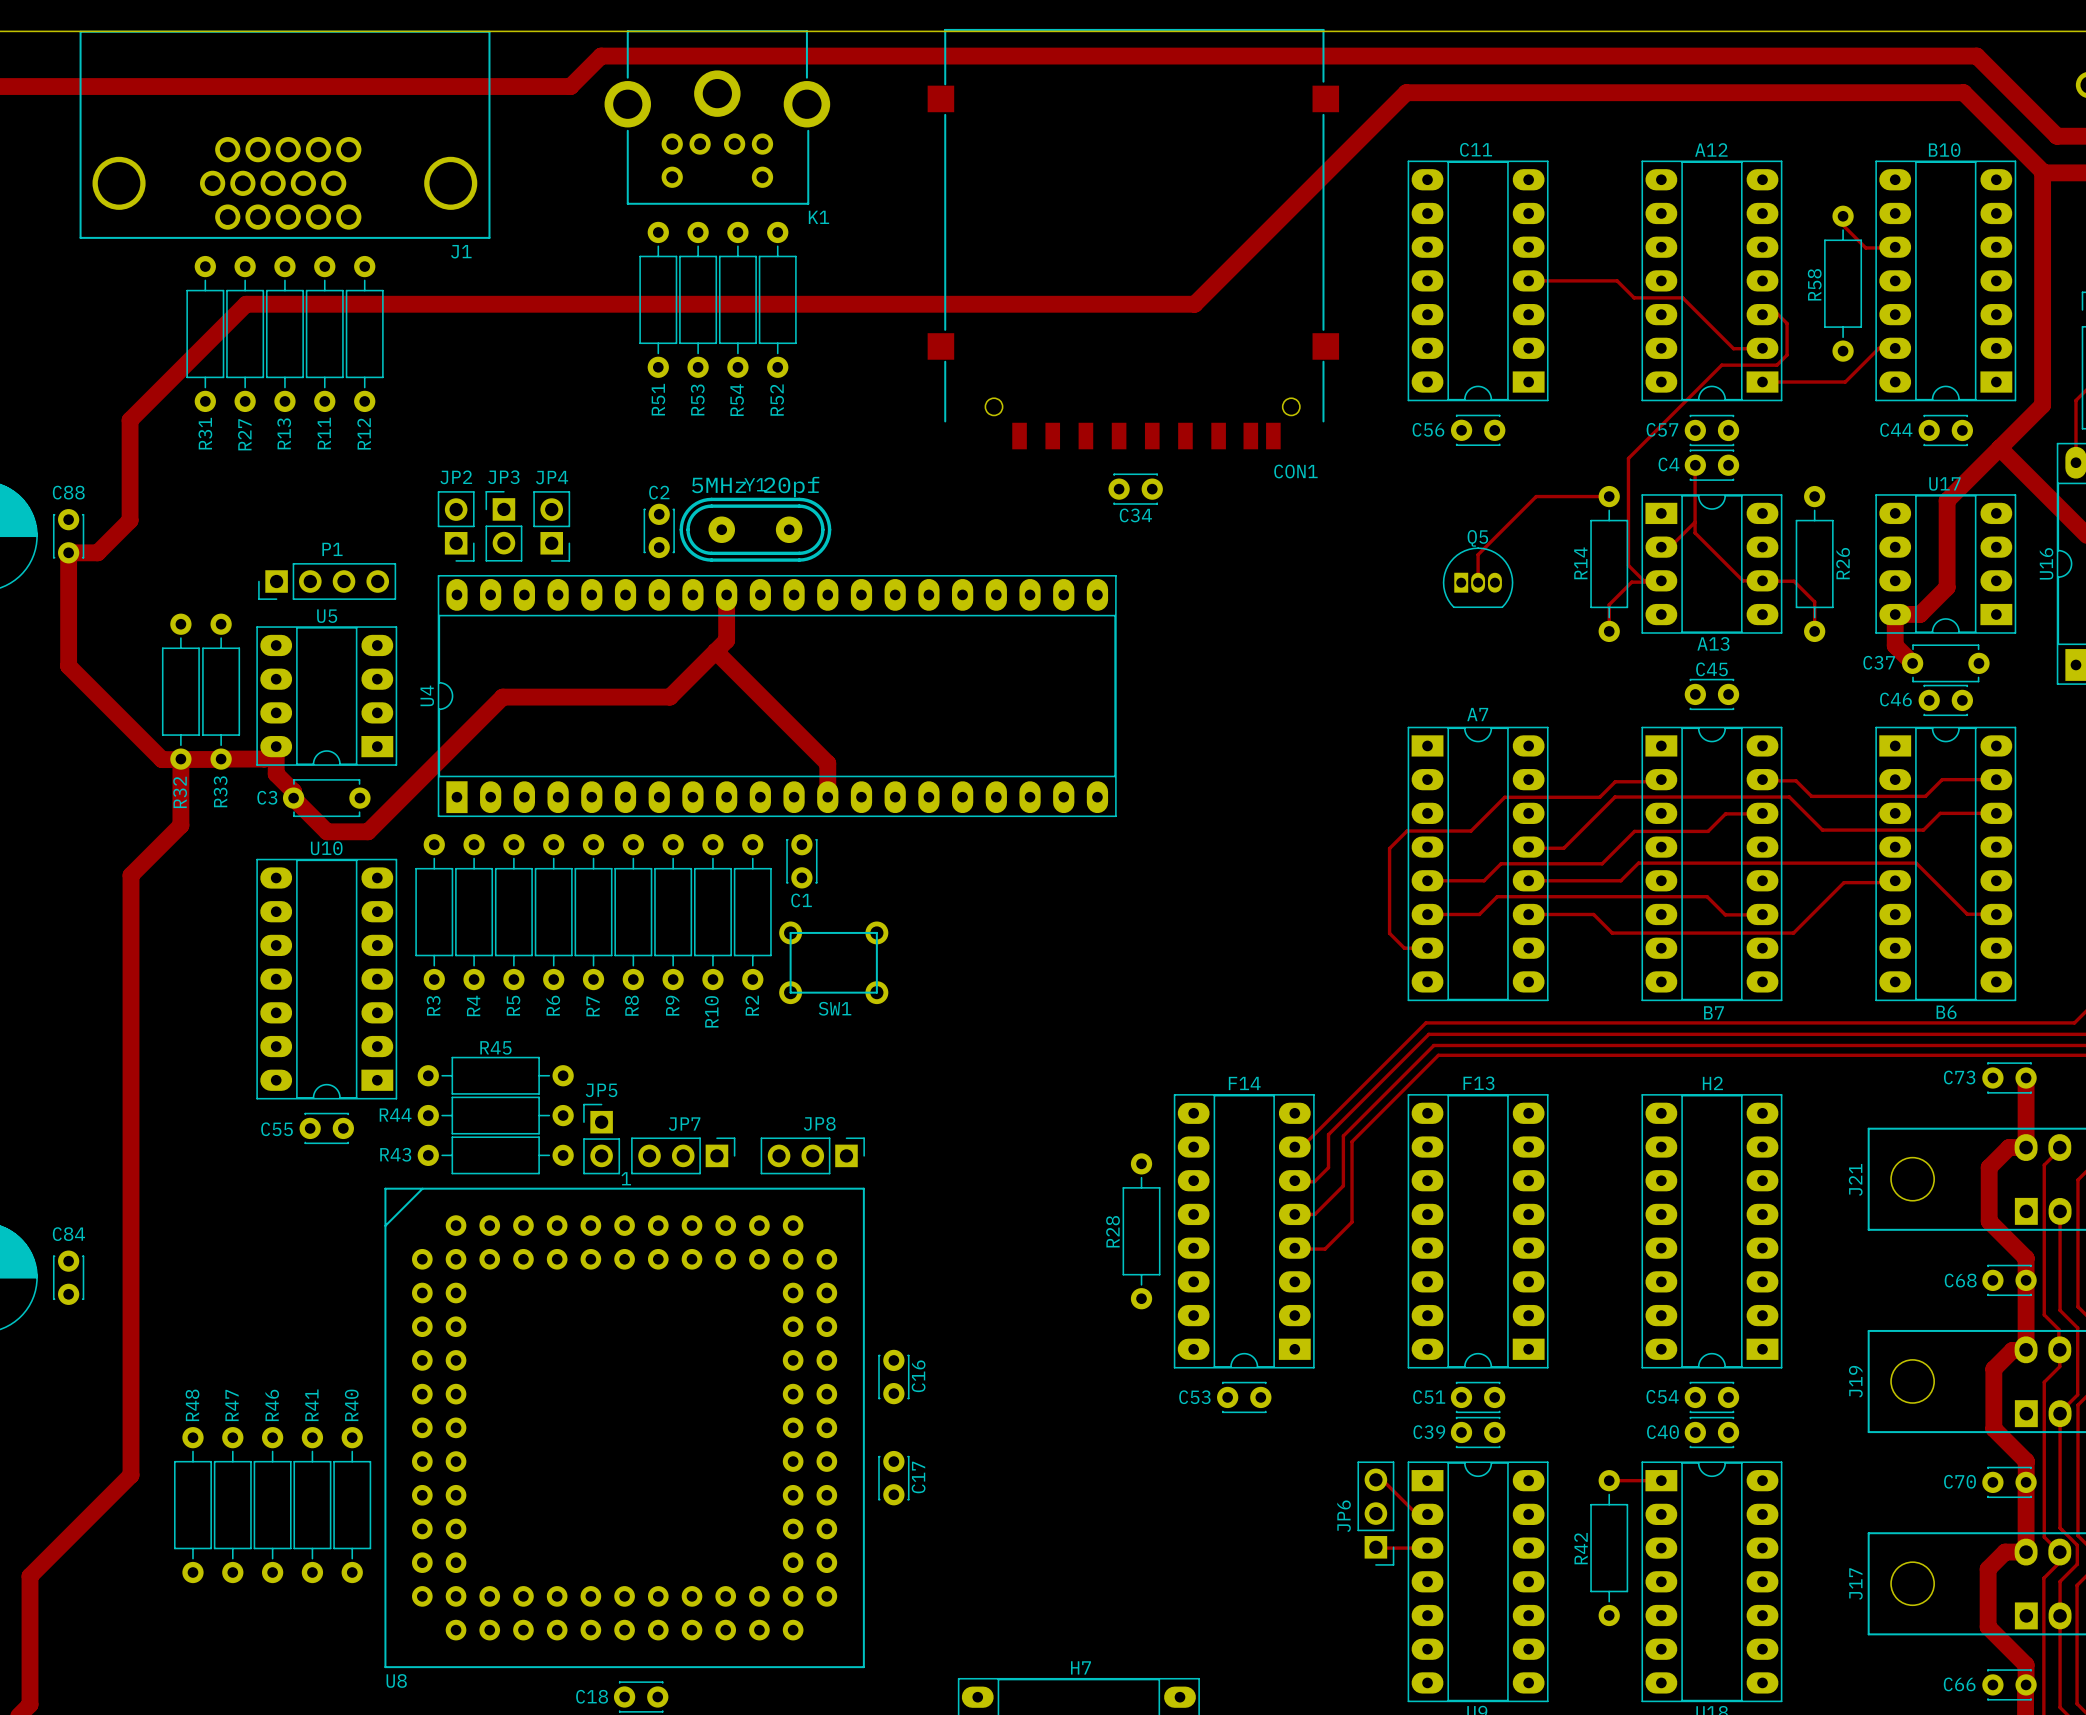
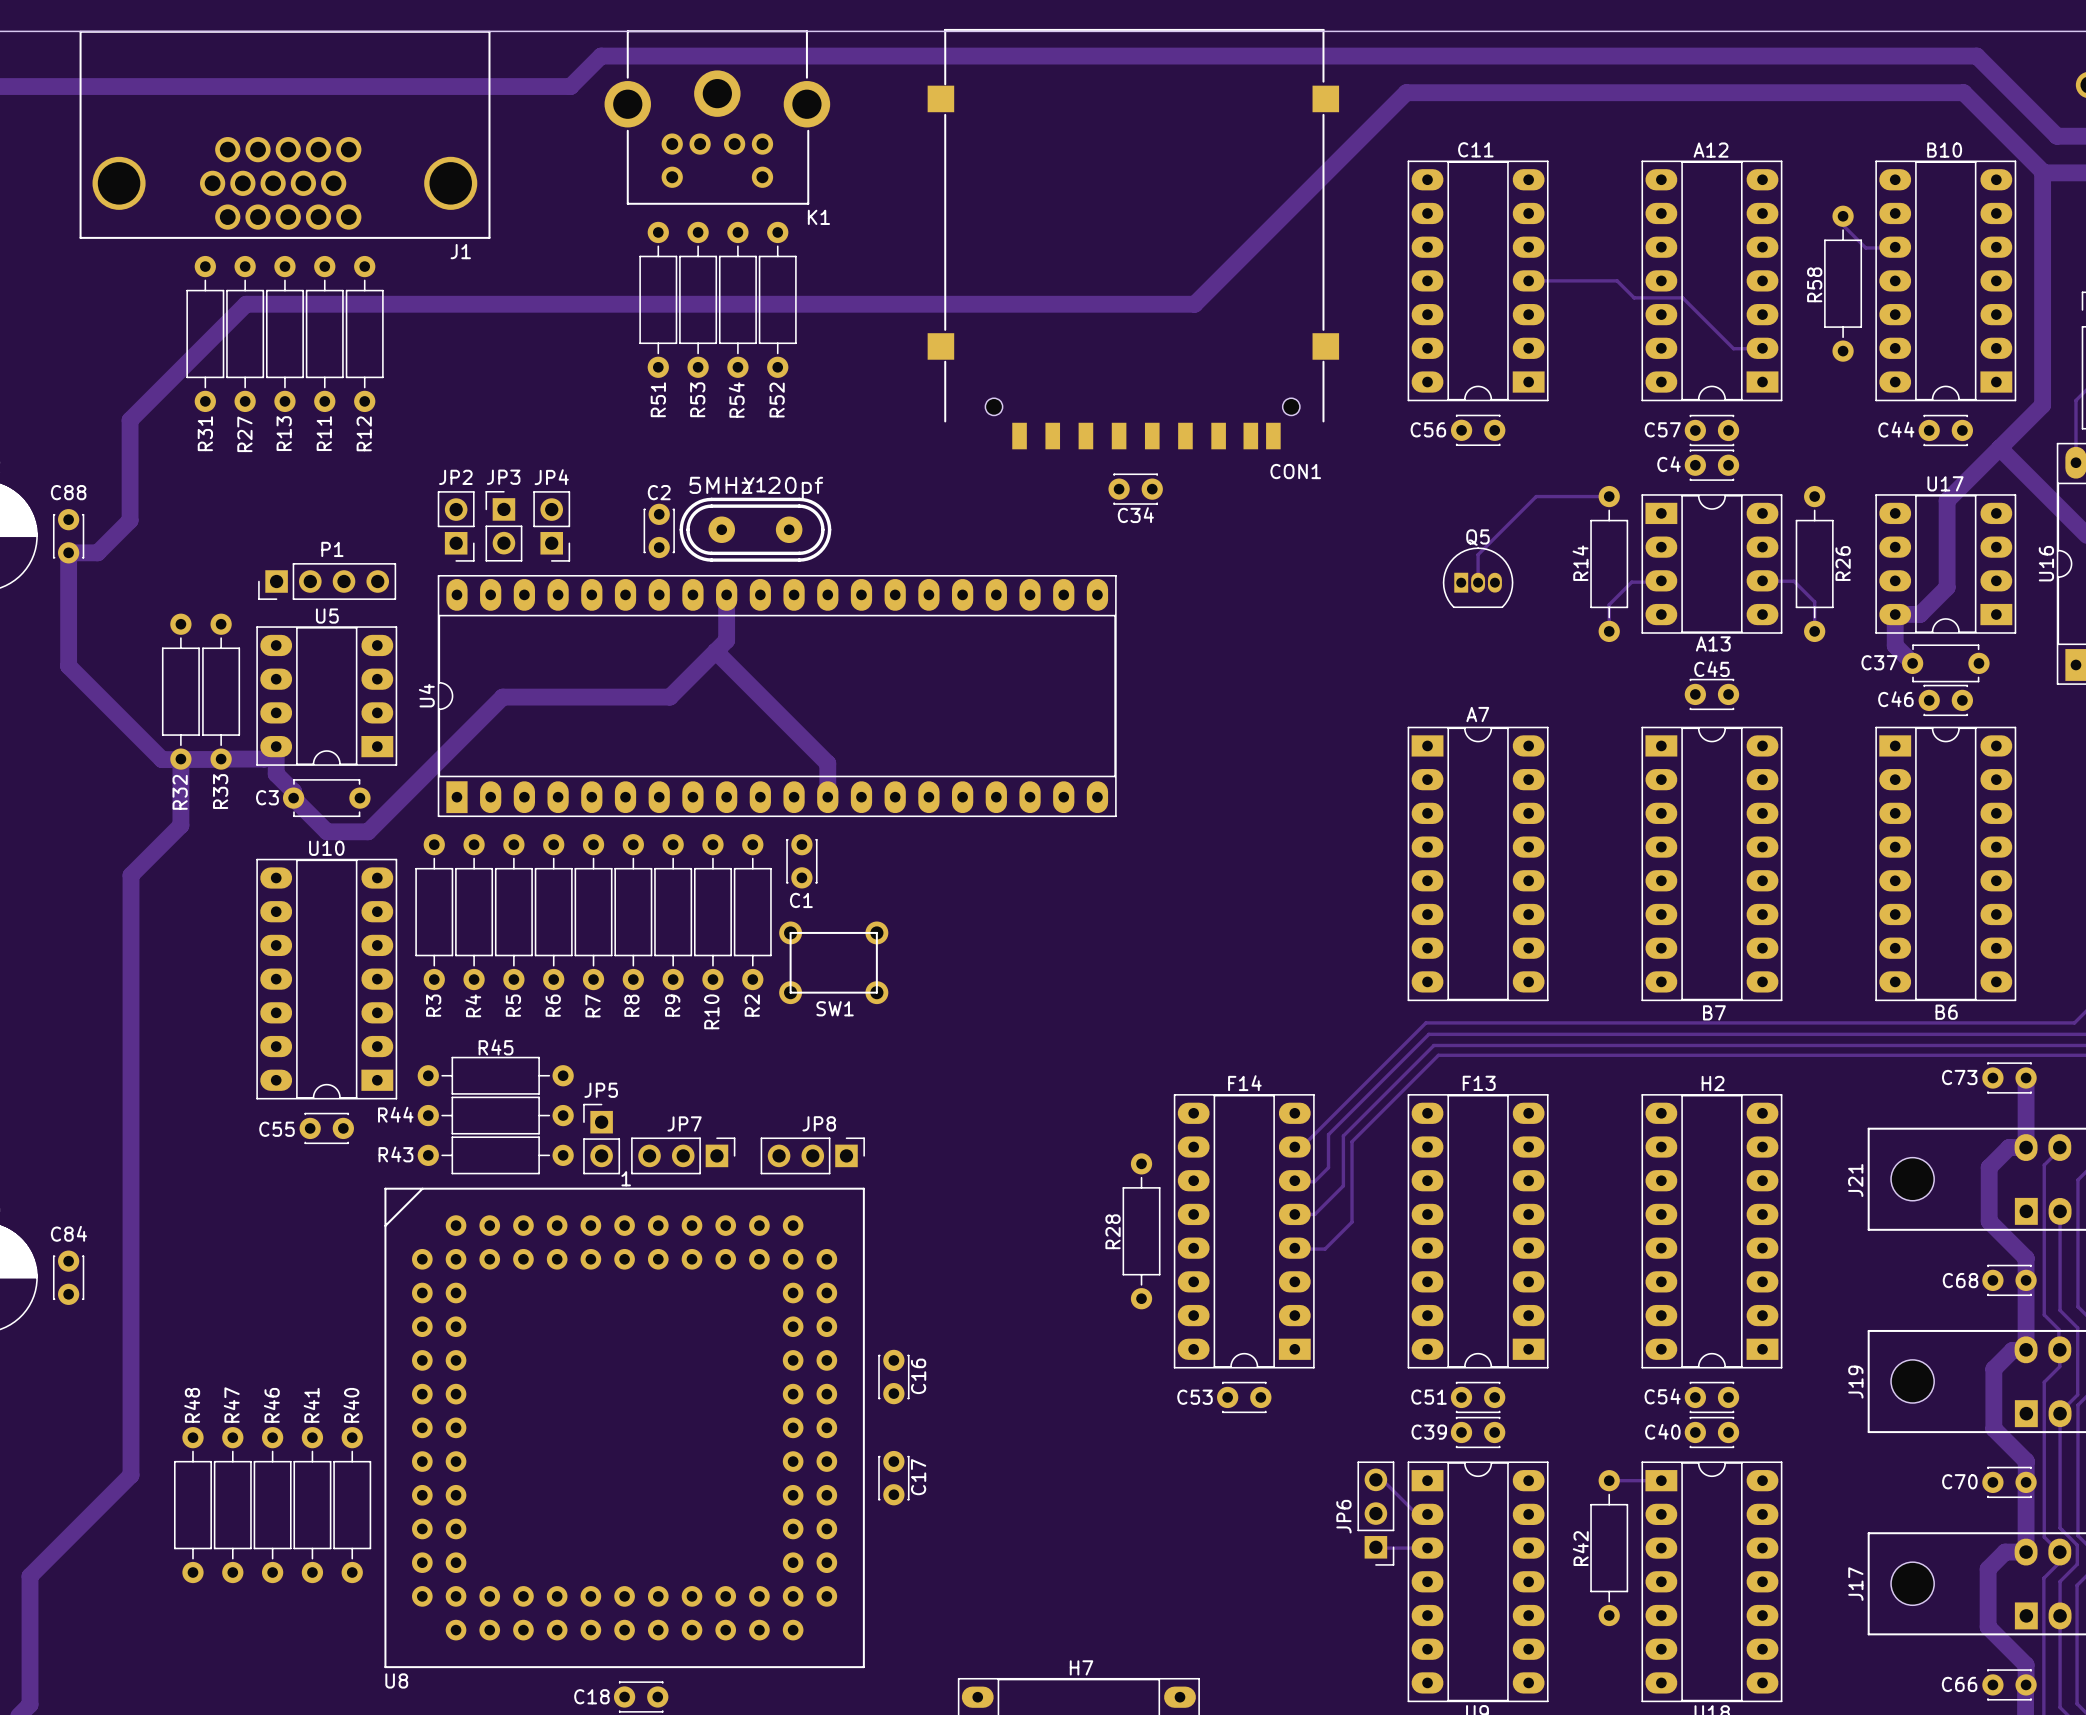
track: (1761, 313) (1777, 313) (1787, 323) (1787, 355) (1776, 365) (1721, 365) (1628, 458) (1628, 565) (1643, 580) (1661, 580) -> none
track: (1895, 348) (1879, 348) (1845, 382) (1762, 382) -> none
track: (1695, 465) (1695, 532) (1743, 580) (1762, 580) -> none
track: (1695, 522) (1670, 547) (1661, 547) -> none
track: (1996, 779) (1942, 779) (1925, 796) (1811, 796) (1796, 780) (1761, 780) -> none
track: (1661, 781) (1615, 781) (1599, 797) (1504, 797) (1471, 831) (1407, 831) (1389, 848) (1389, 933) (1404, 948) (1427, 948) -> none
track: (1765, 813) (1725, 813) (1708, 831) (1634, 831) (1602, 863) (1501, 863) (1484, 880) (1427, 880) -> none
track: (1996, 813) (1940, 813) (1923, 830) (1822, 830) (1789, 797) (1615, 797) (1563, 848) (1527, 848) -> none
track: (1528, 880) (1620, 880) (1638, 863) (1916, 863) (1967, 914) (1996, 914) -> none
track: (1895, 882) (1843, 882) (1793, 933) (1612, 933) (1593, 914) (1528, 914) -> none
track: (1427, 914) (1479, 914) (1497, 896) (1707, 896) (1725, 914) (1760, 914) -> none

